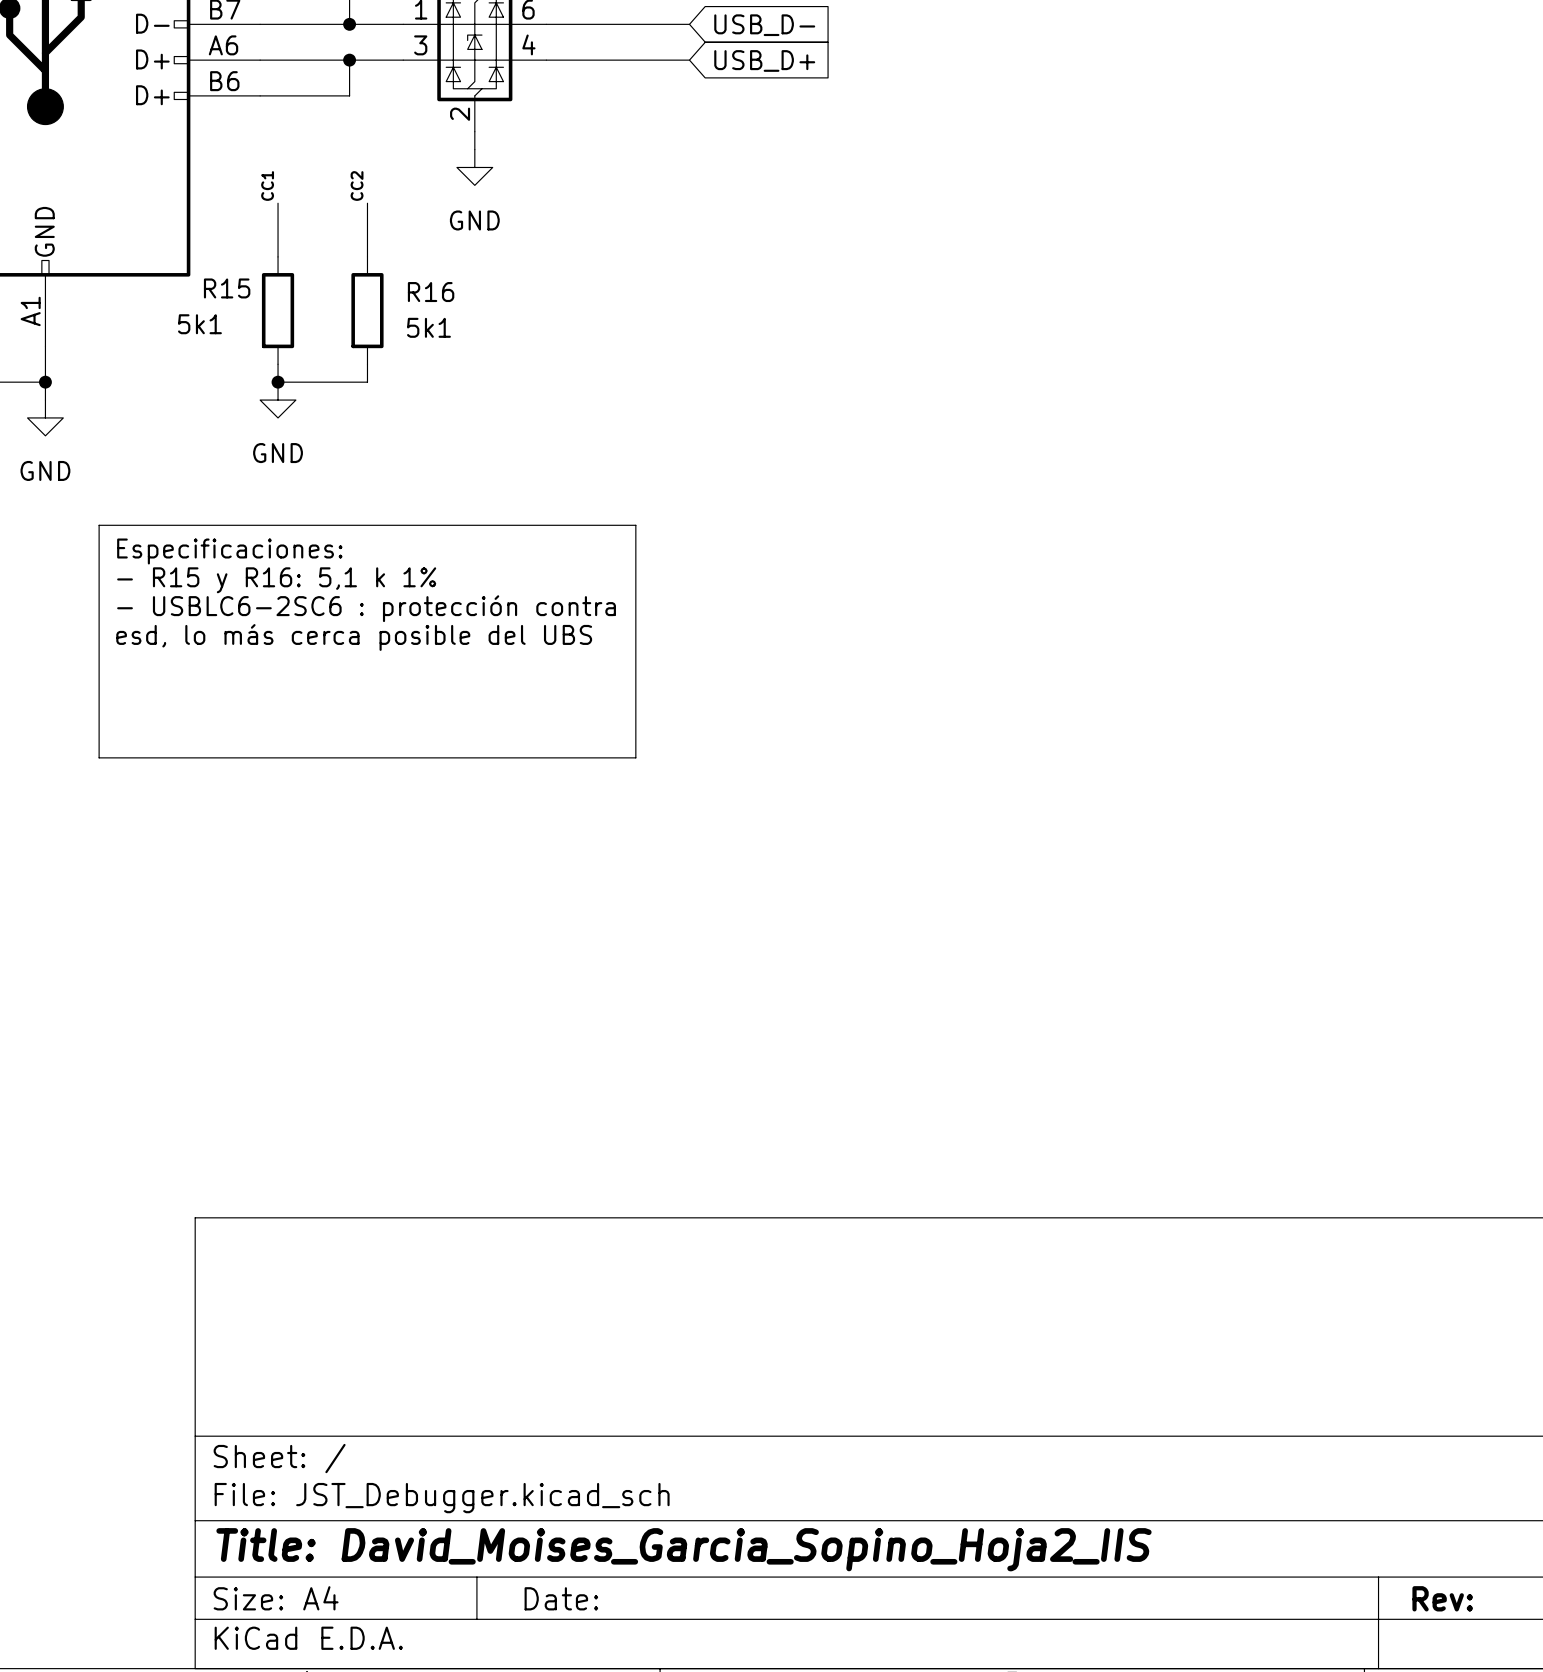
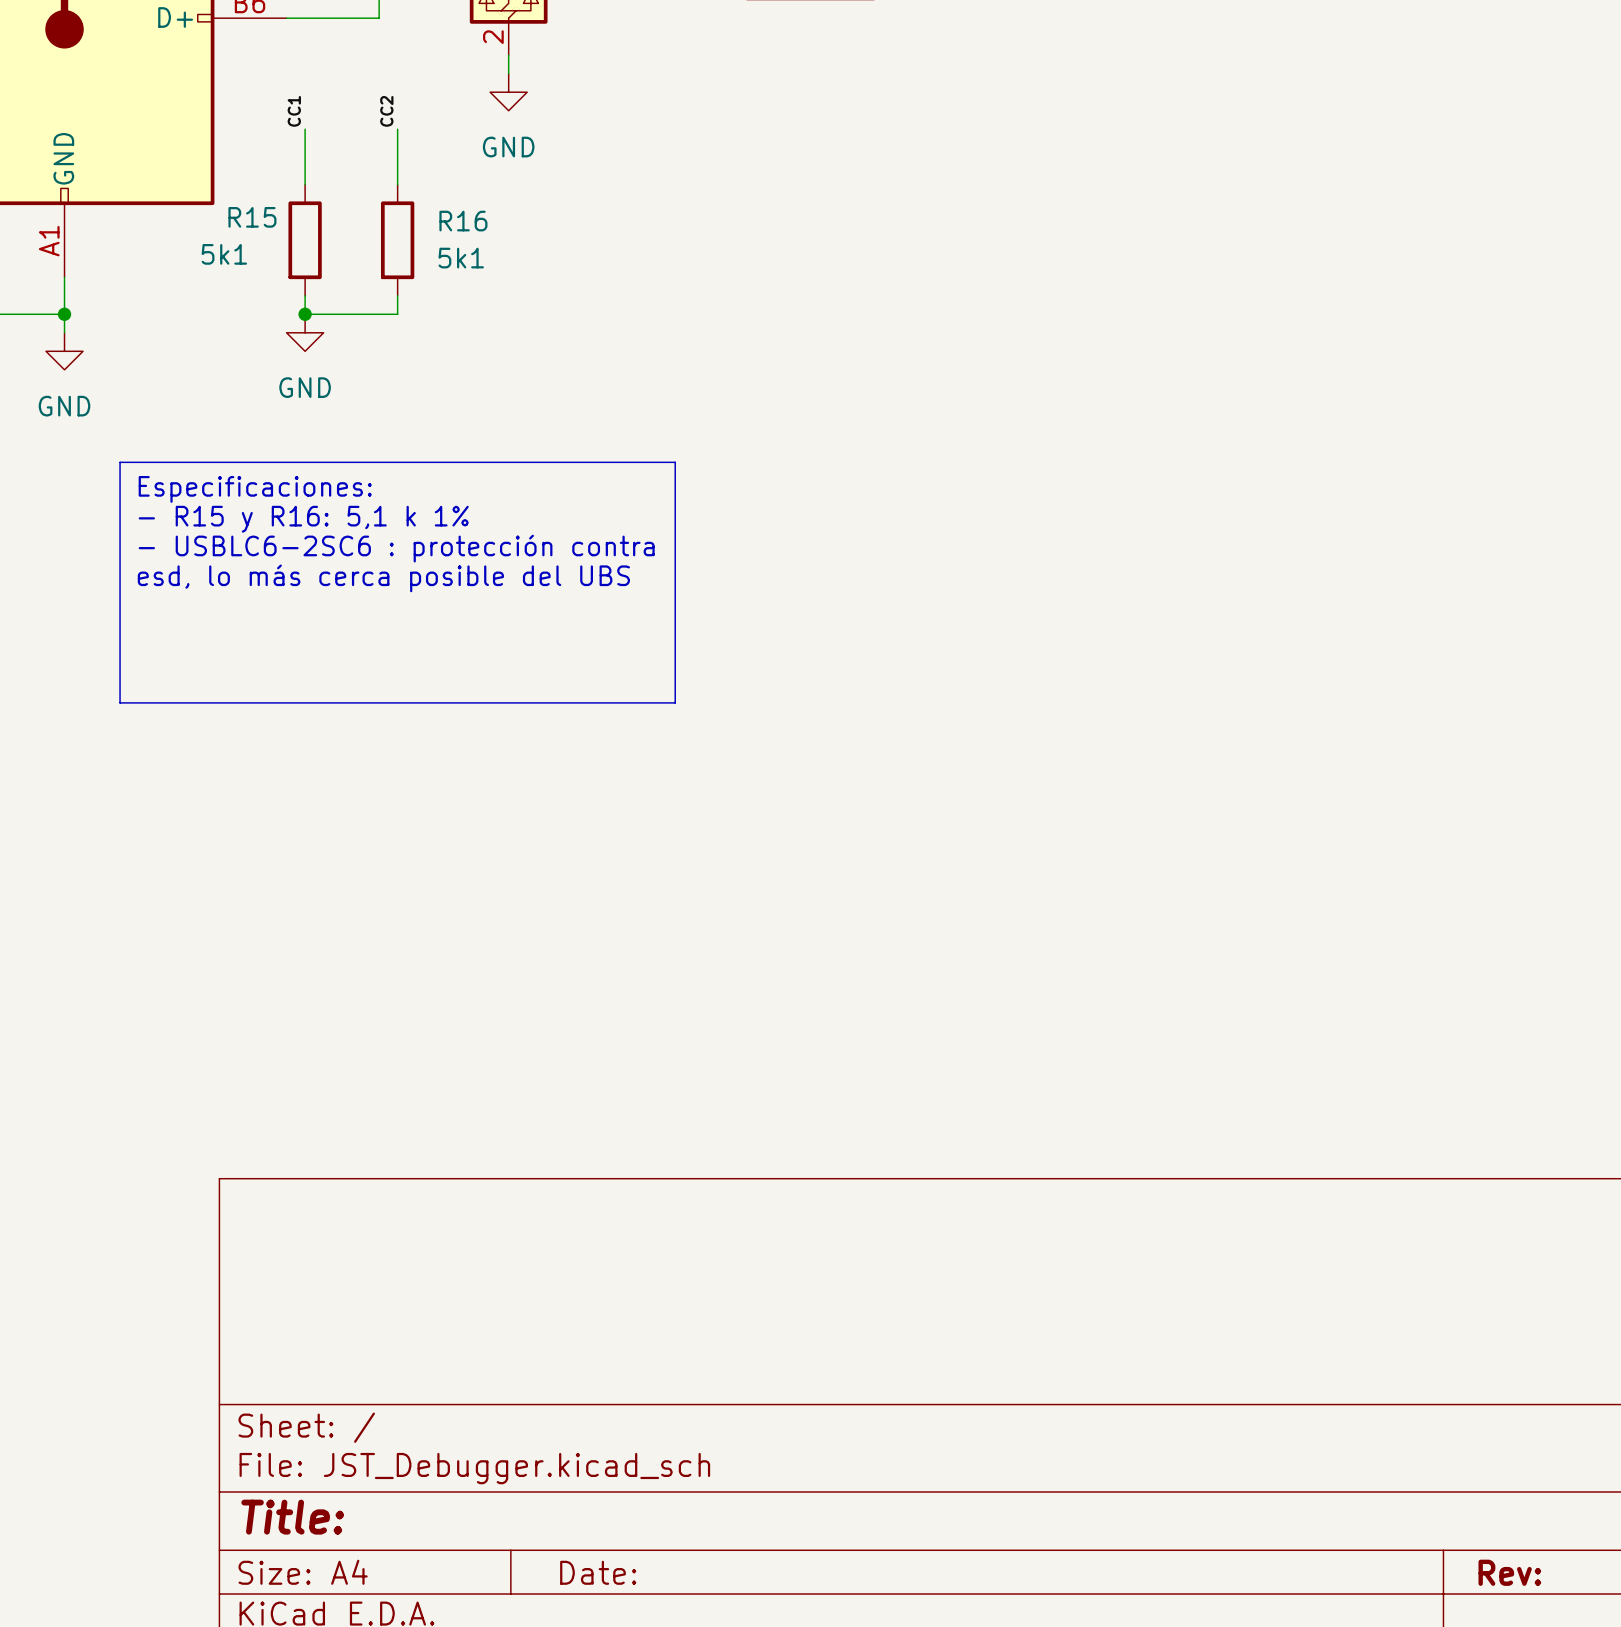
title block: Title: David_Moises_Garcia_Sopino_Hoja2_IIS (683, 1549) -> Title: (292, 1517)

